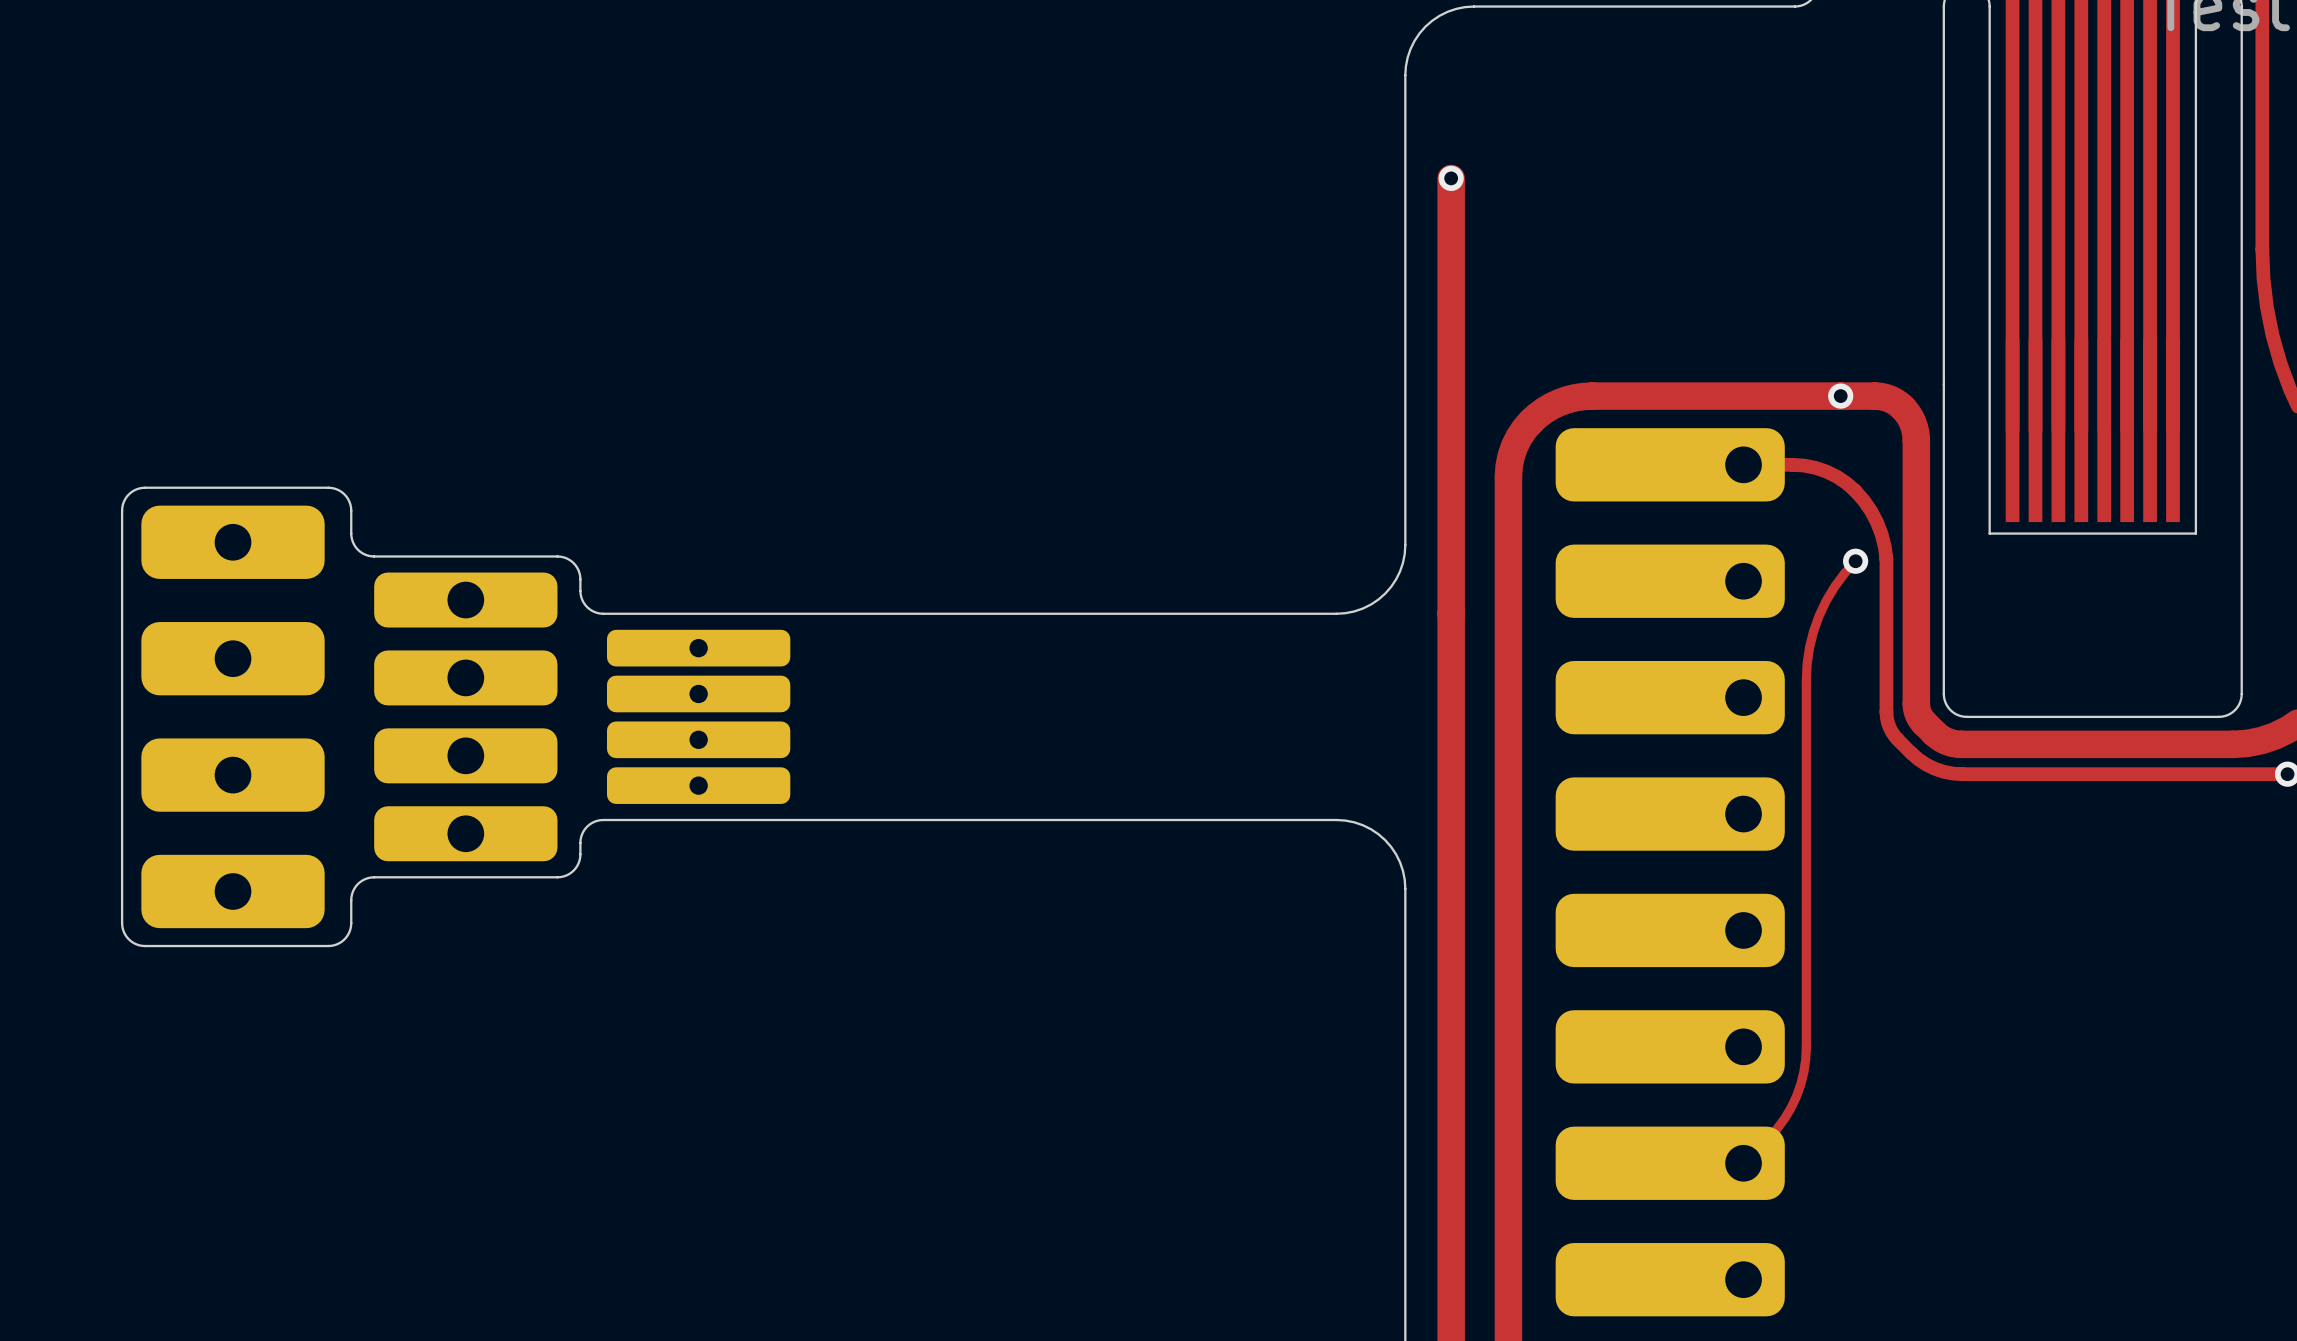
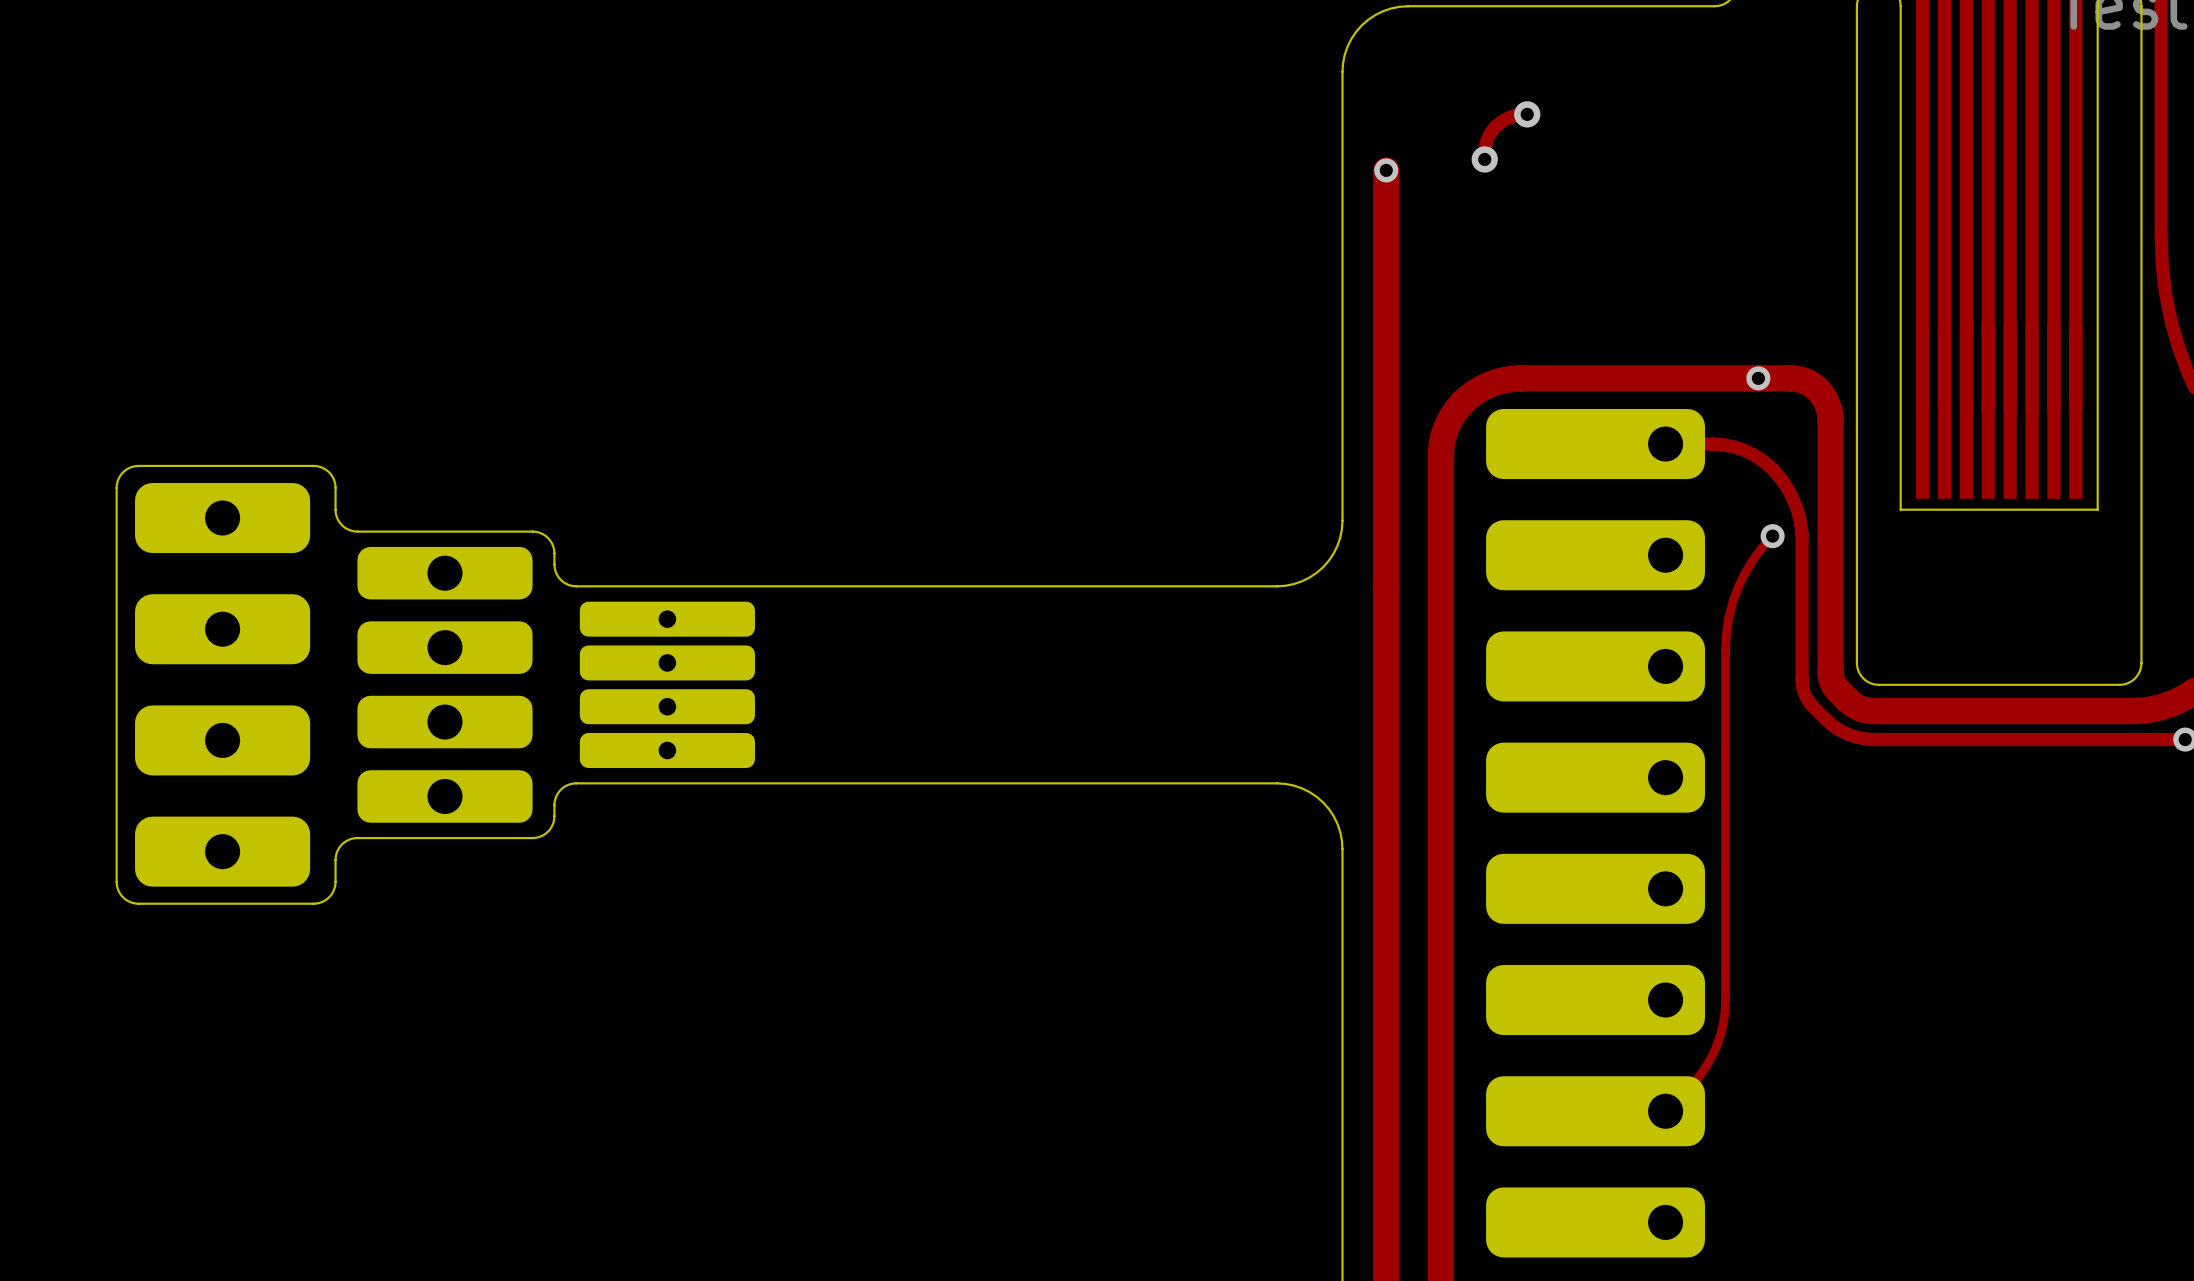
track: none -> (1527, 114) (1509, 117) (1495, 126) (1486, 142) (1484, 159)
via: none -> (1527, 114)
via: none -> (1484, 159)

